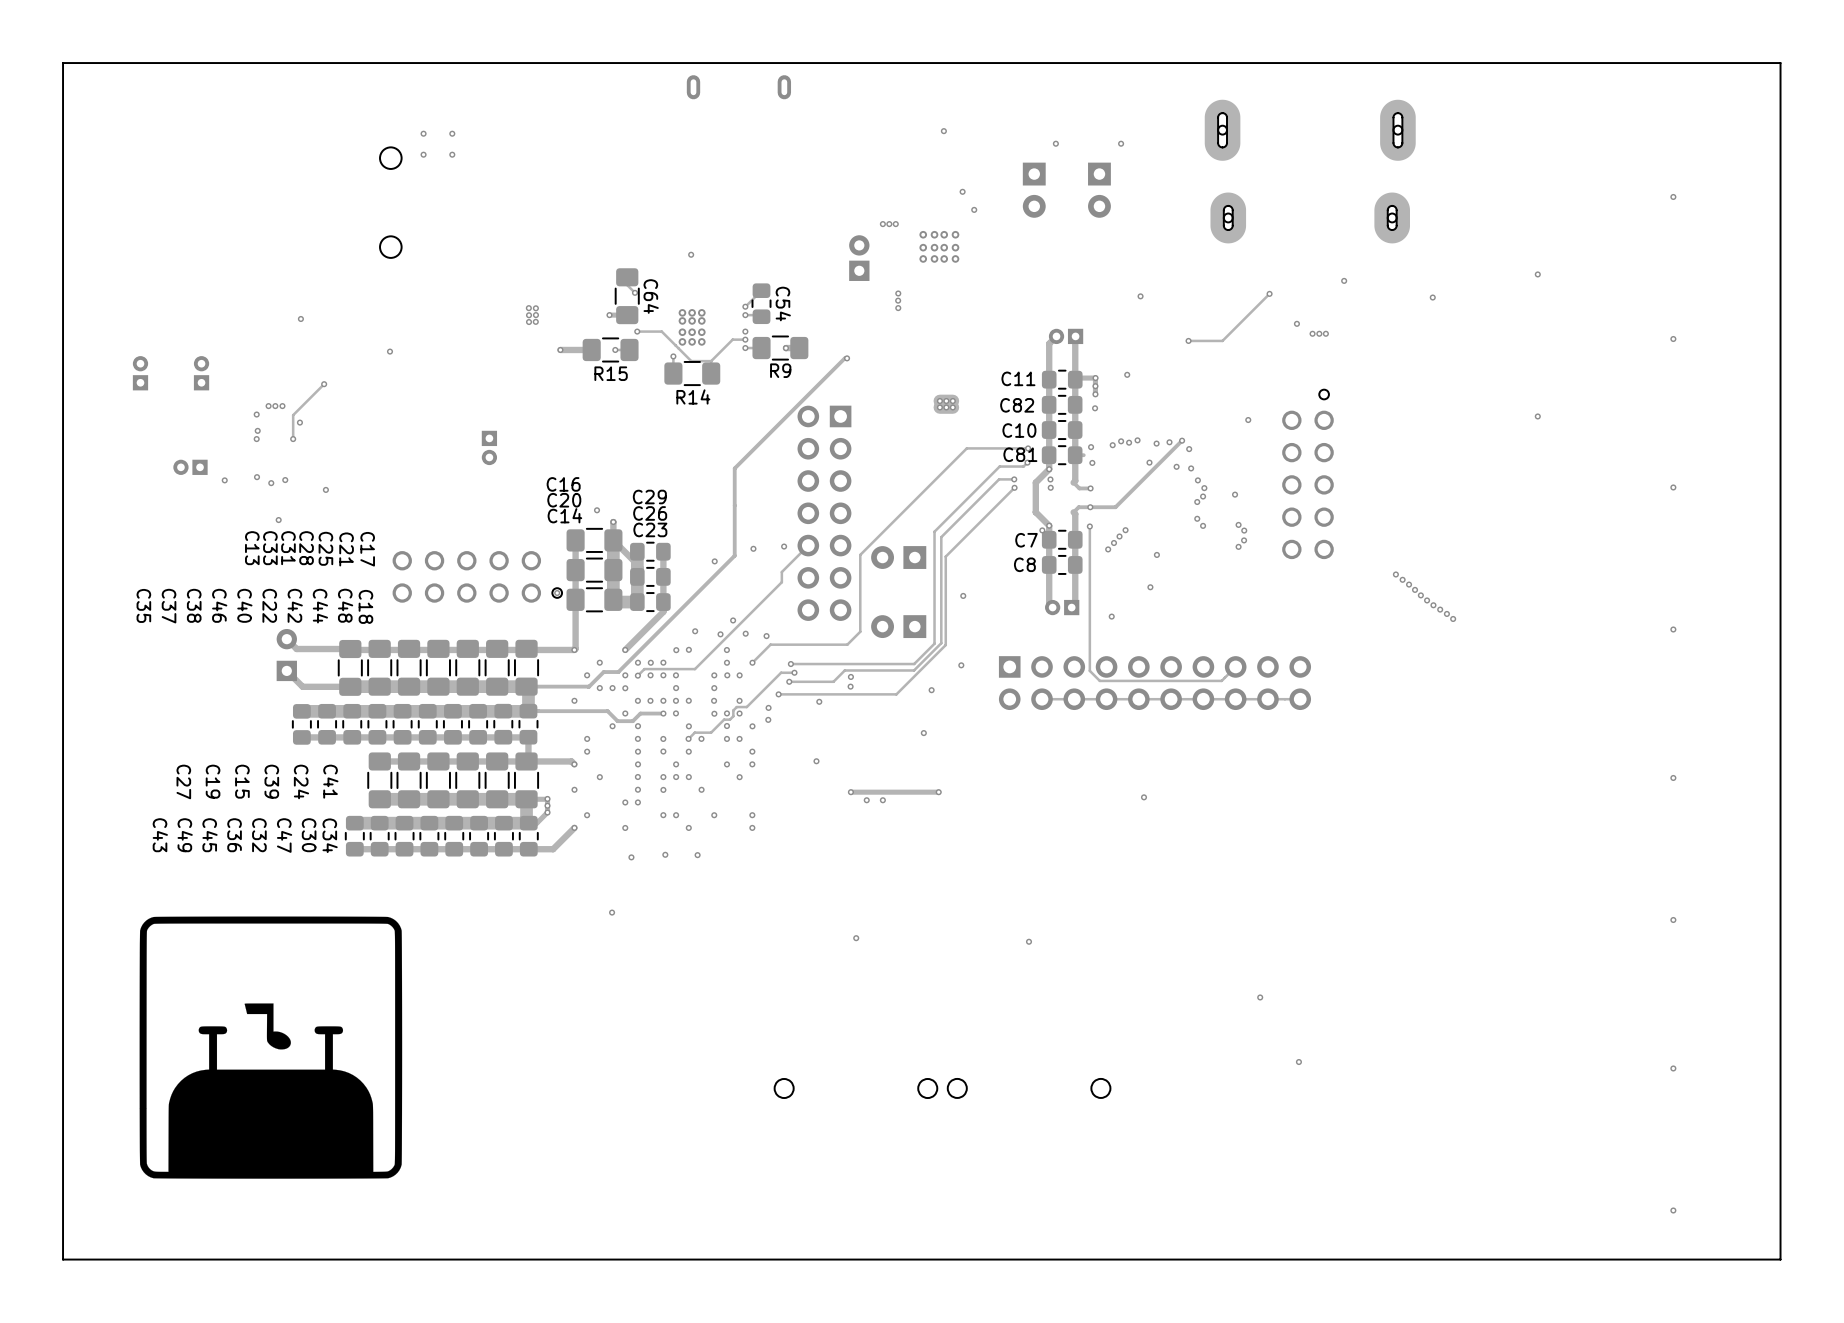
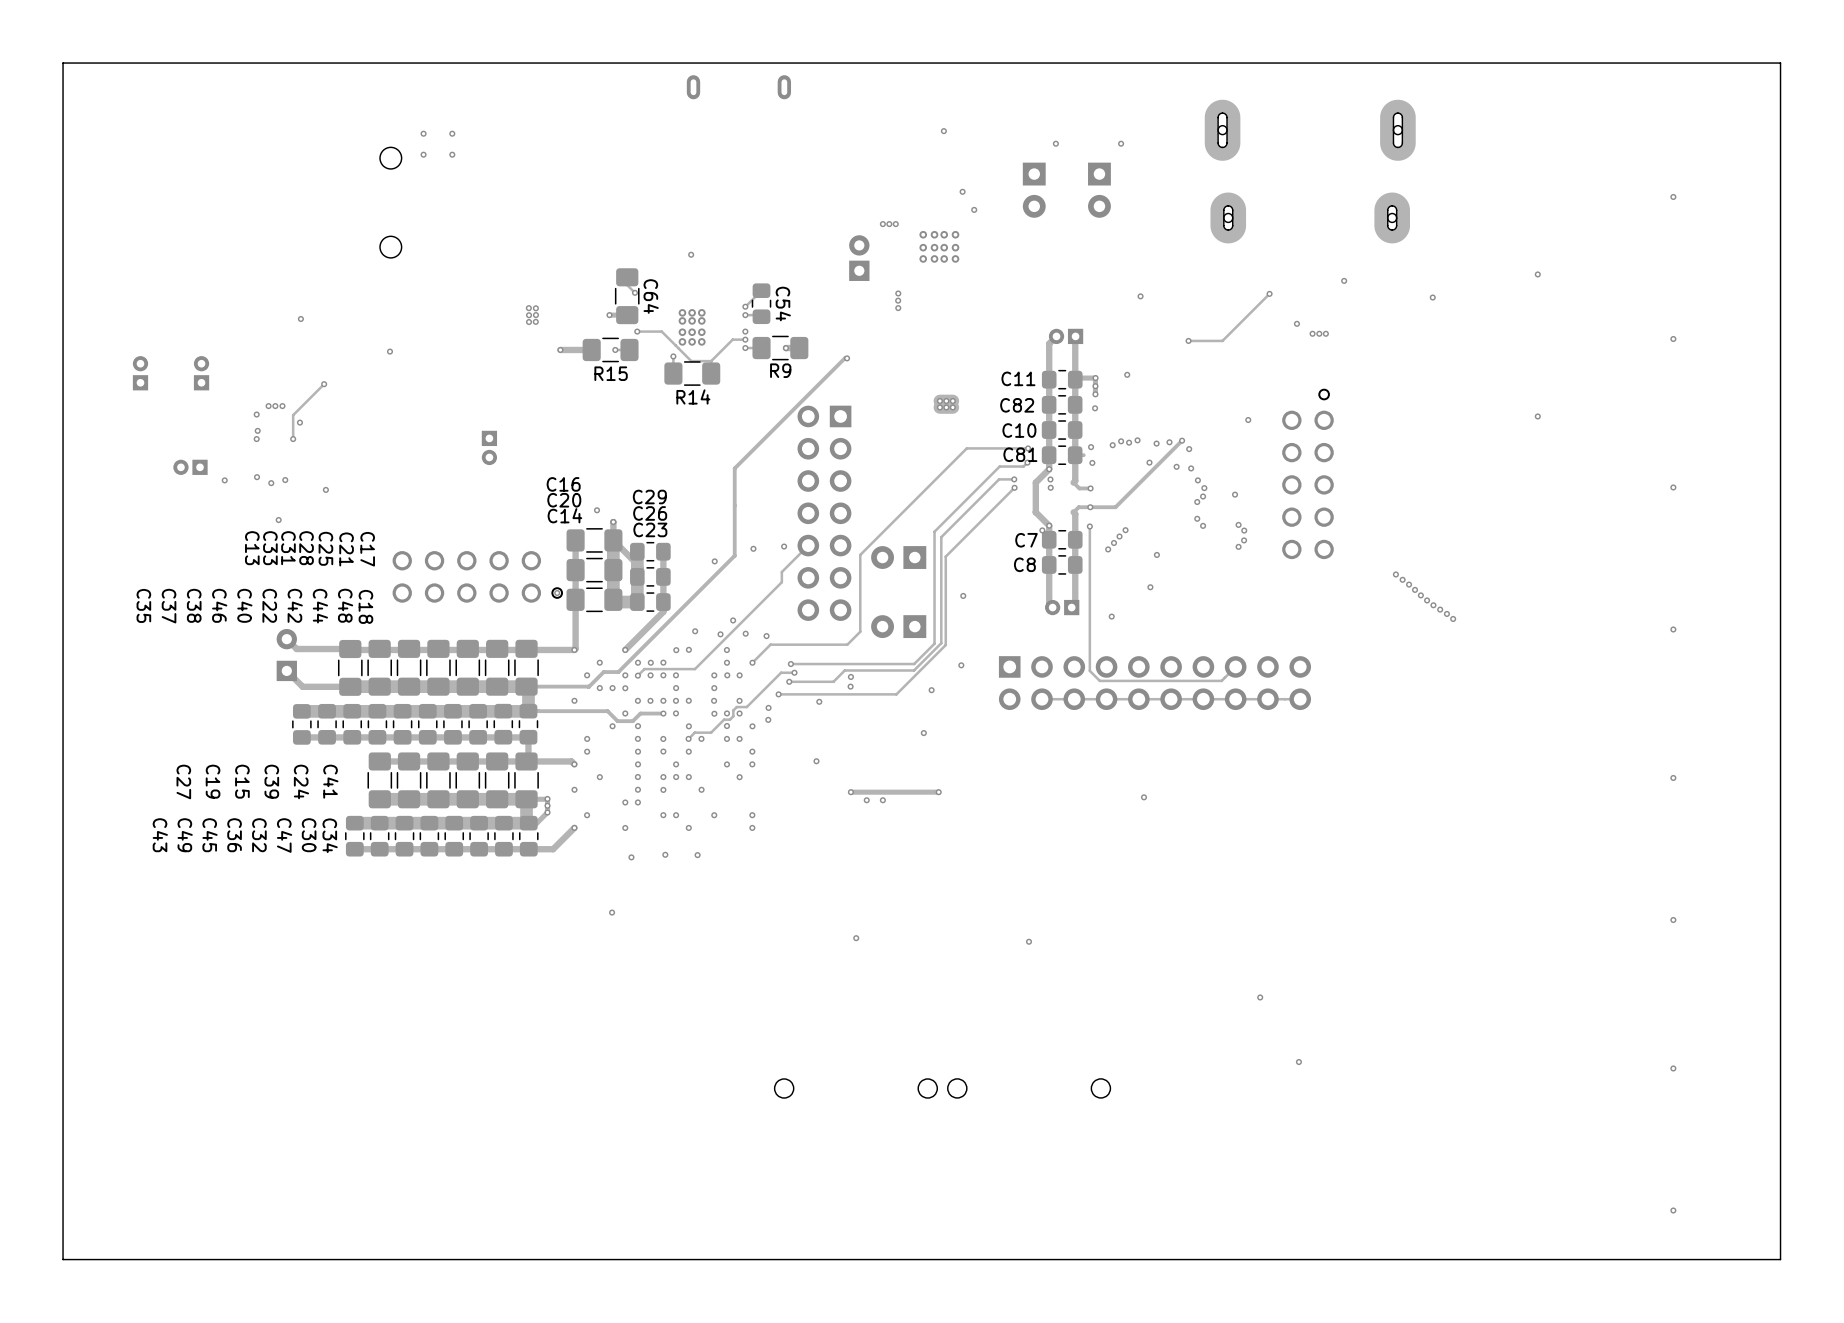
drawing: [139, 916, 403, 1179] -> none

